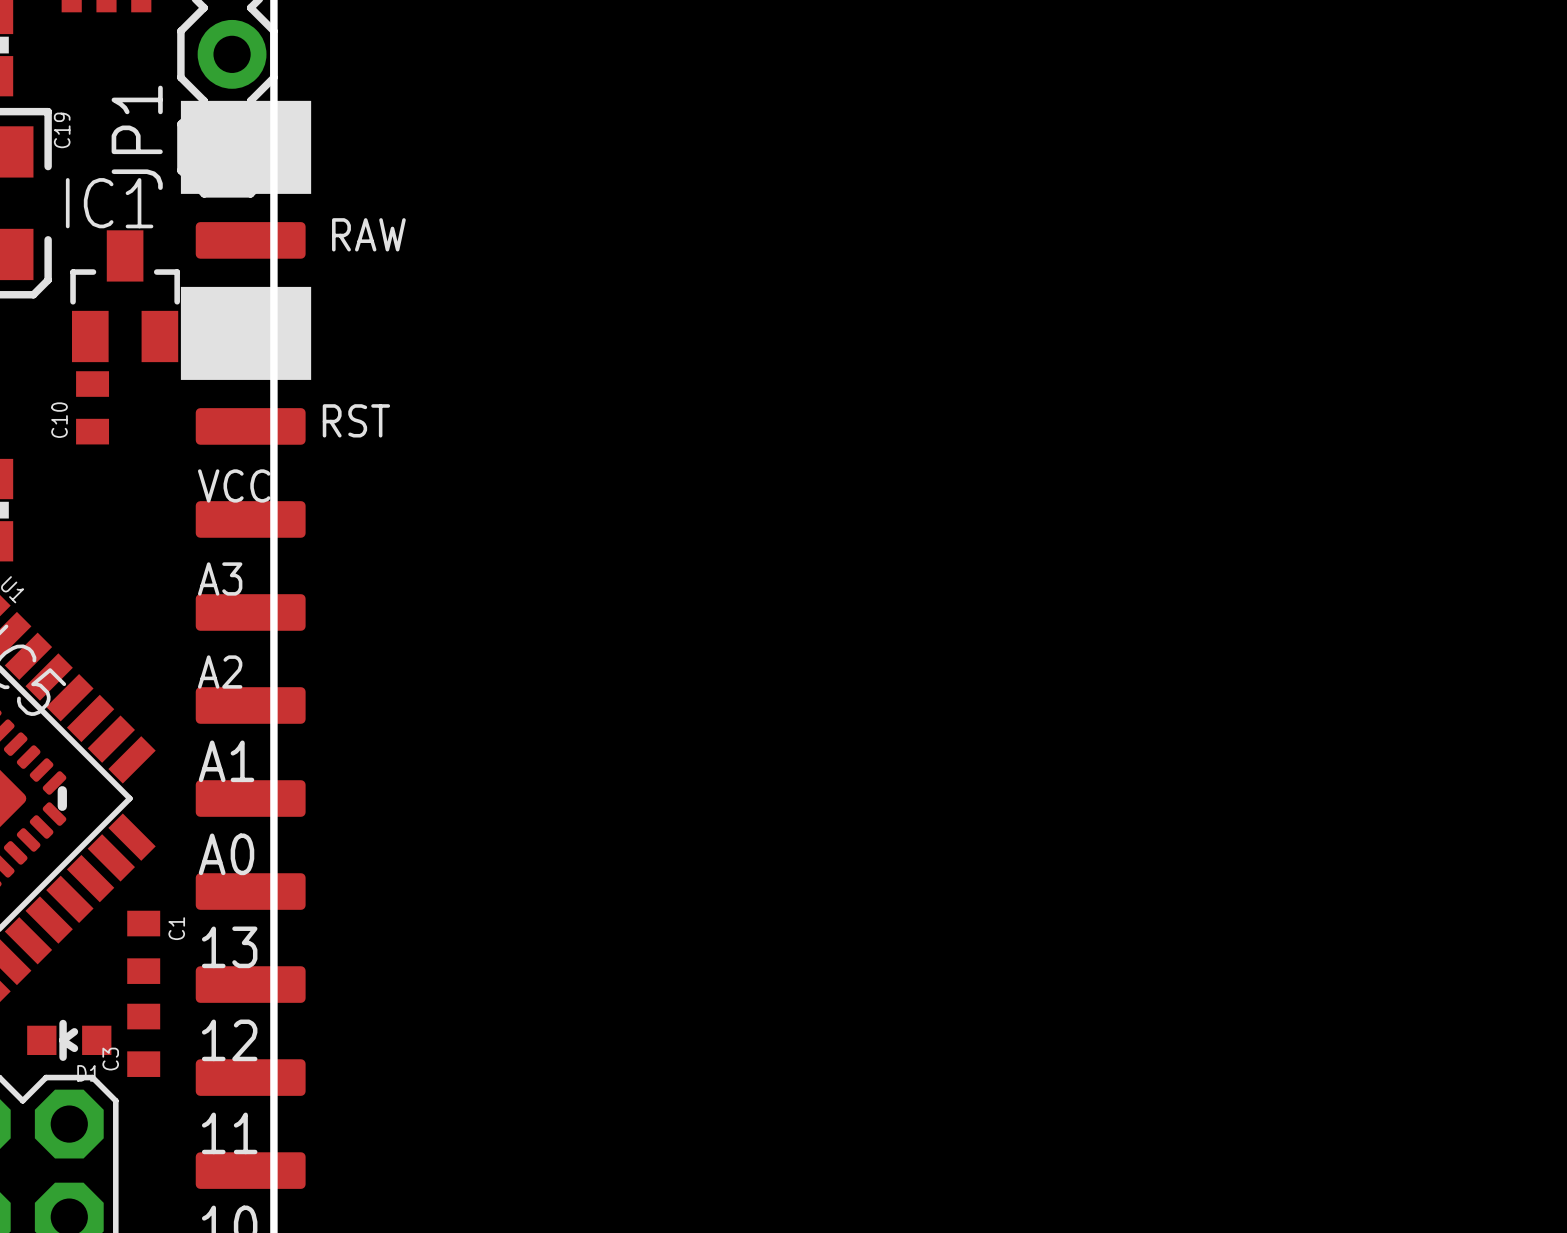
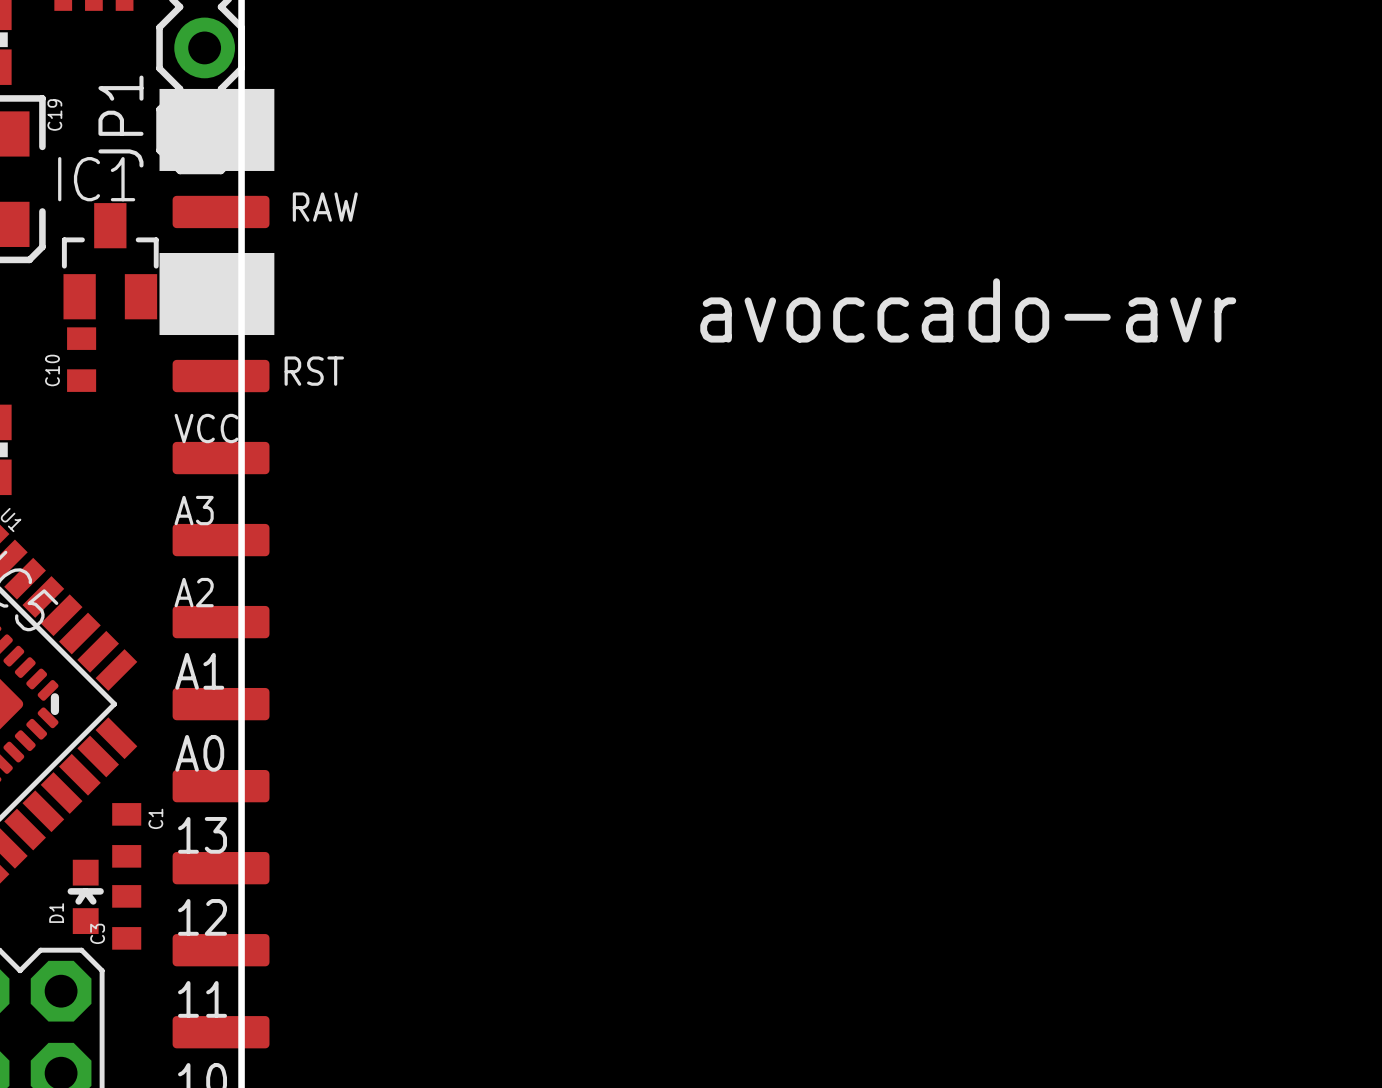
text: none -> avoccado-avr (968, 310)
D1 rotation: 0° (69, 1040) -> 90° clockwise (85, 896)

